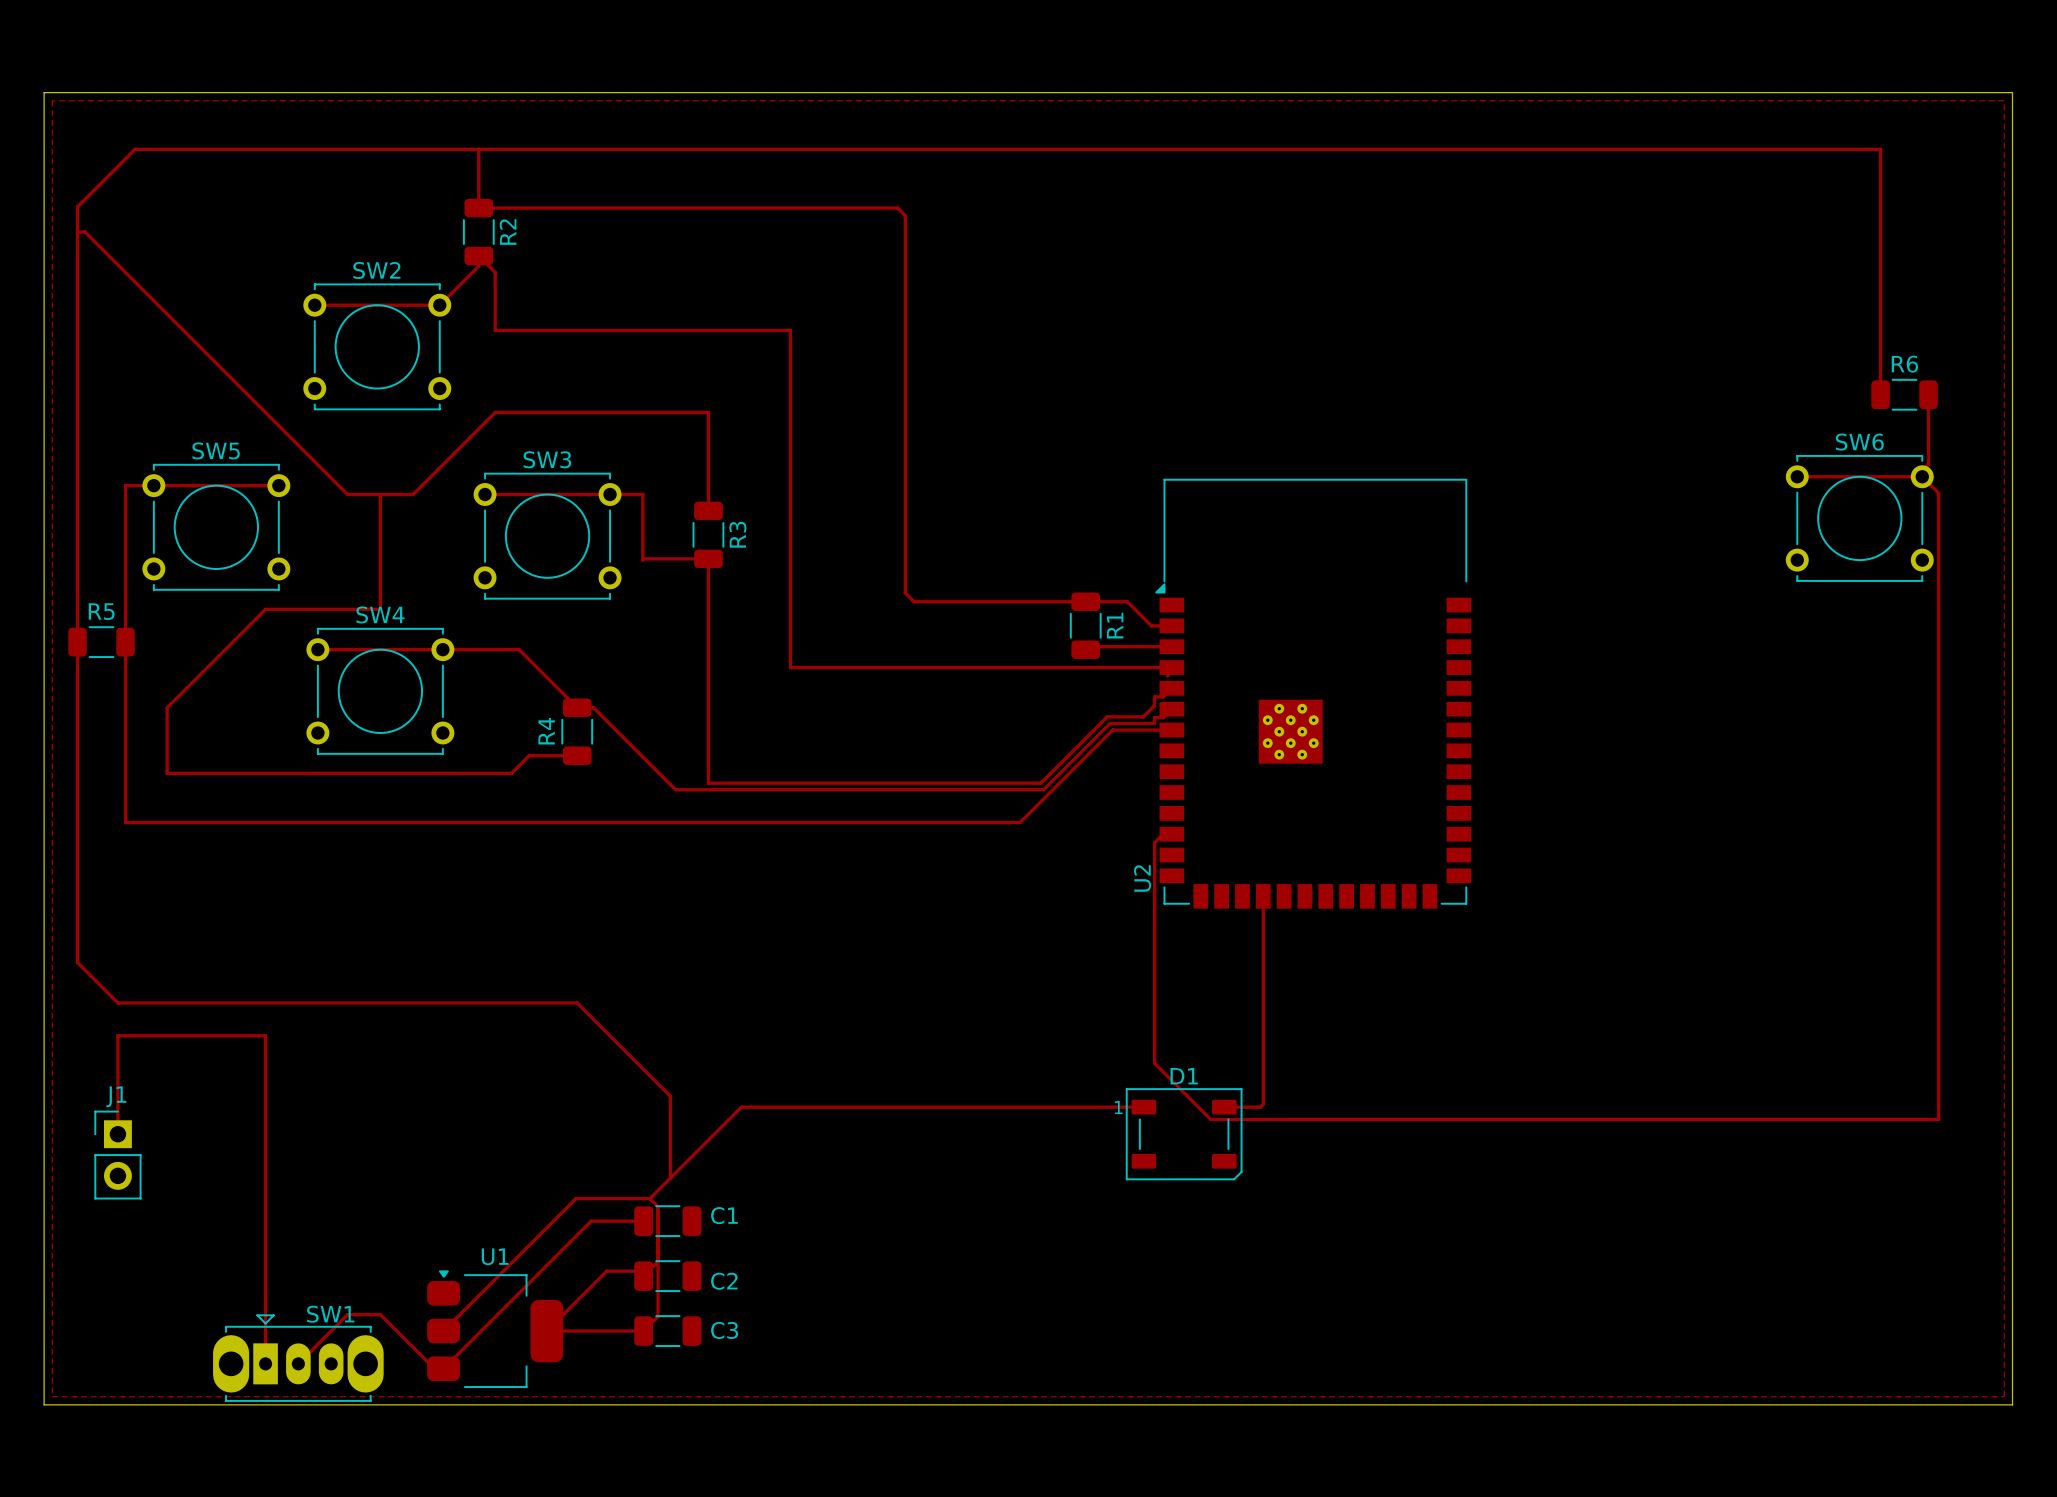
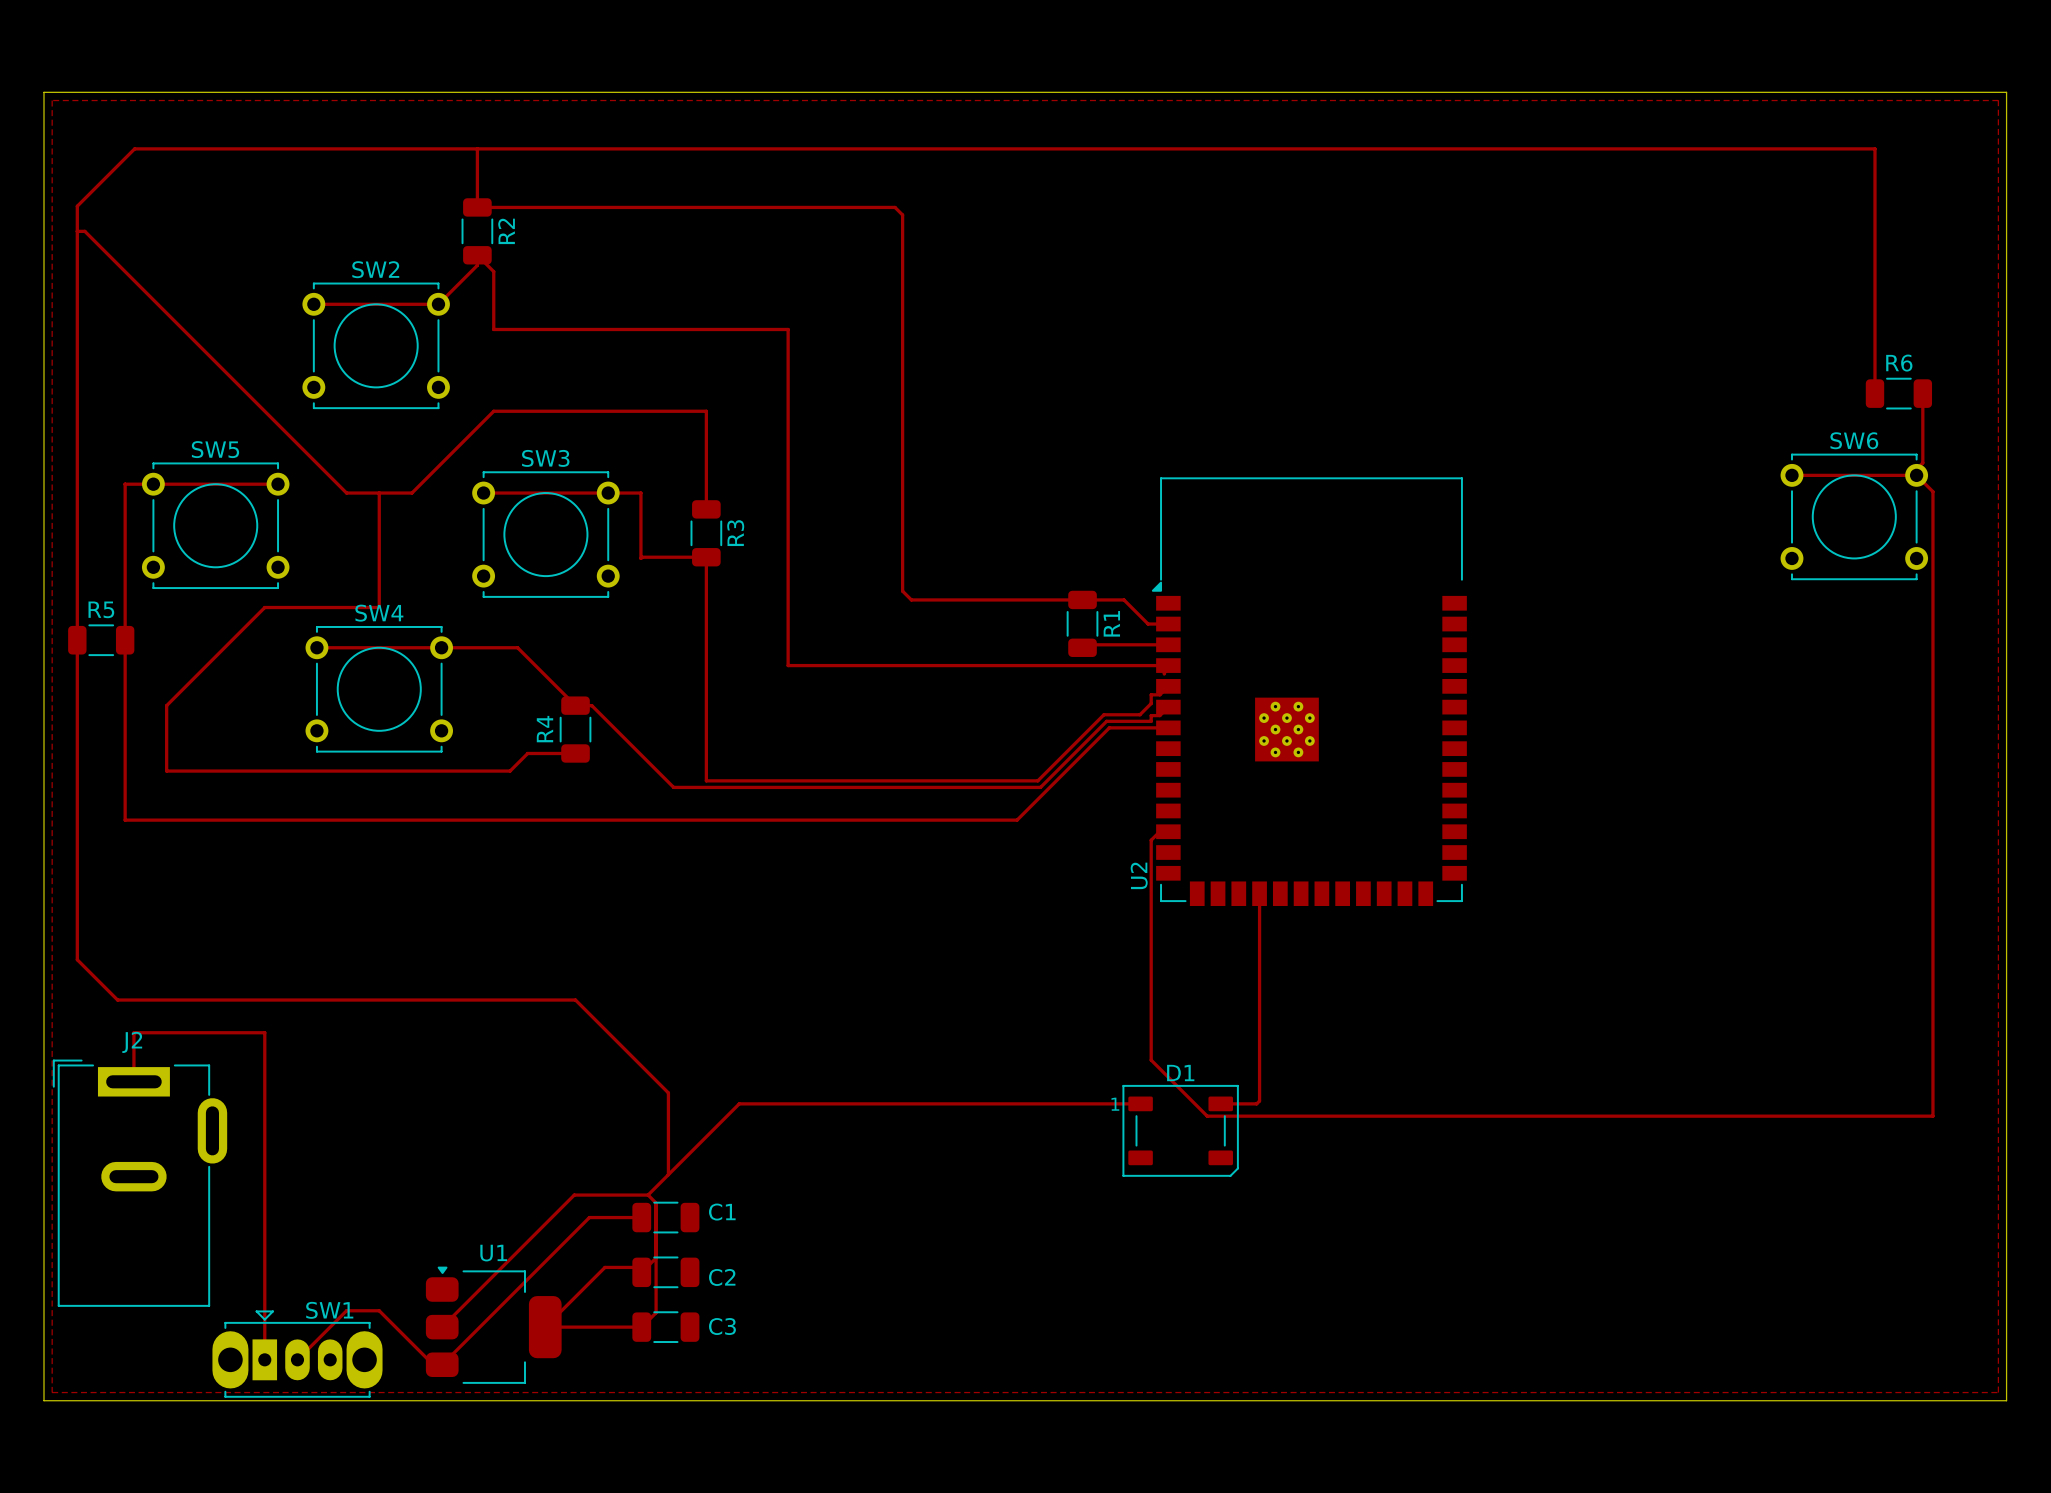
track: (134, 1035) (117, 1035) (117, 1134) -> (133, 1032) (133, 1081)
J1: (117, 1155) -> none
J2: none -> (140, 1183)

